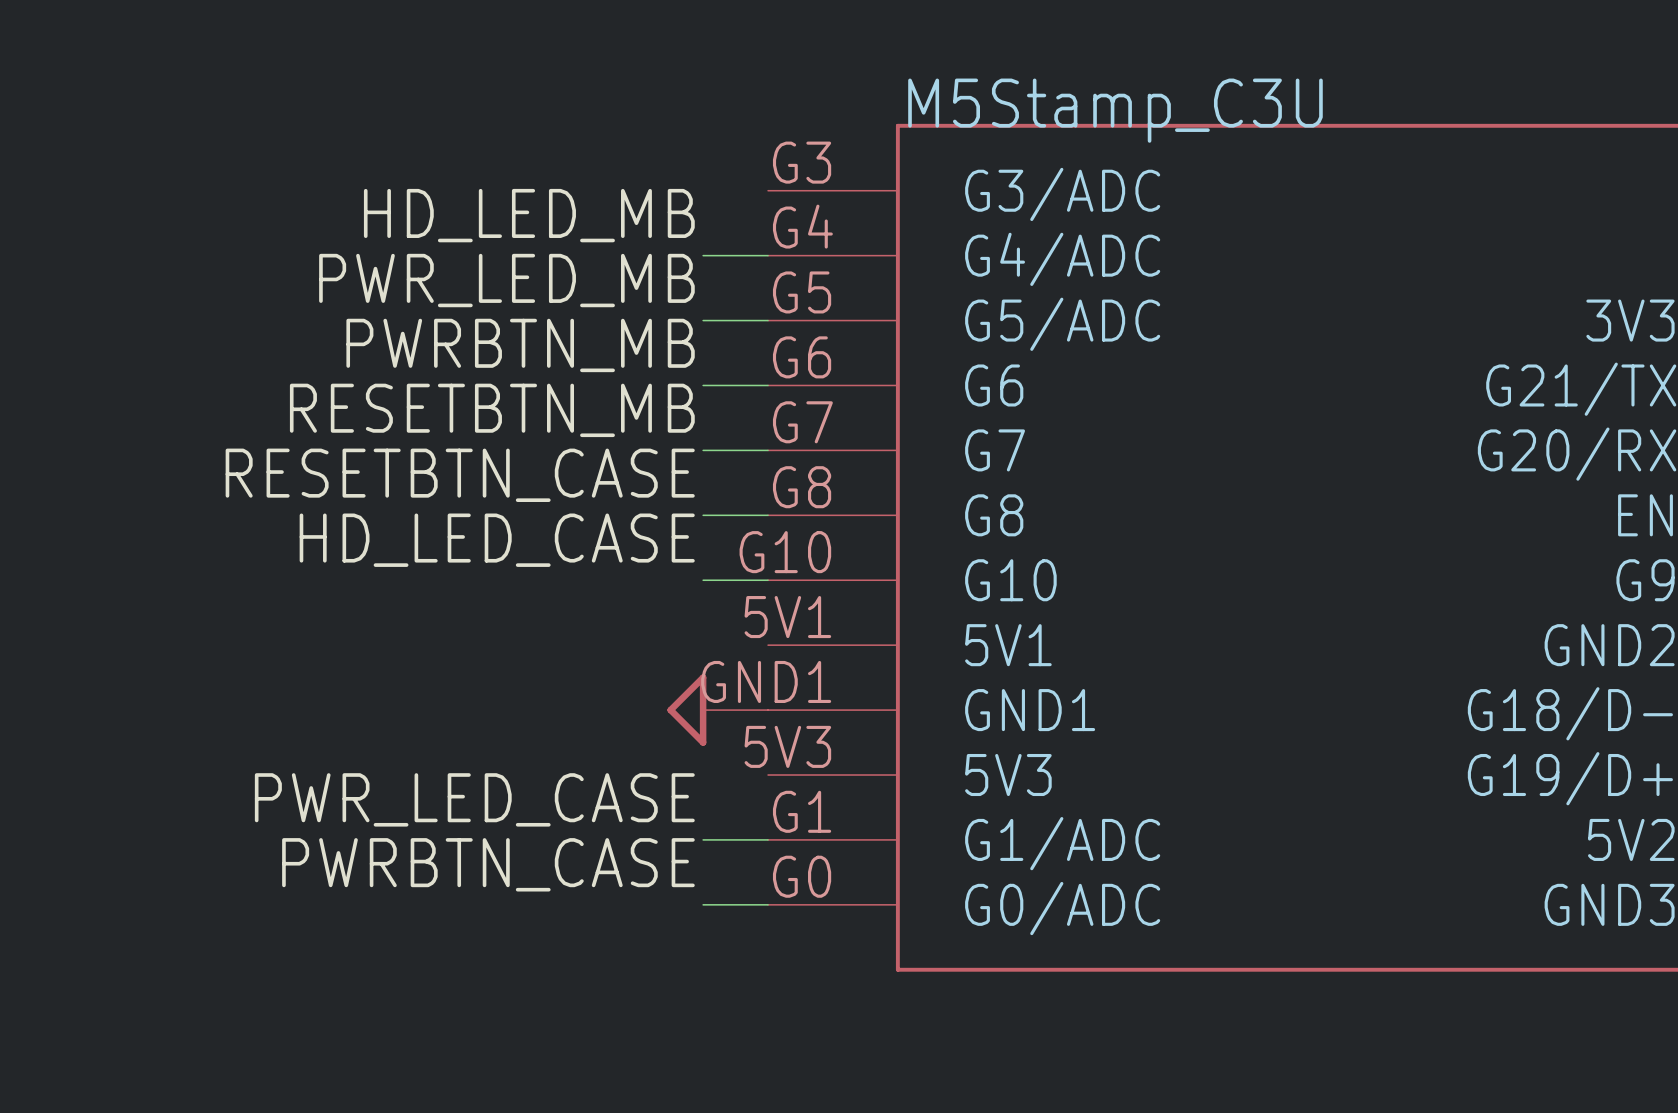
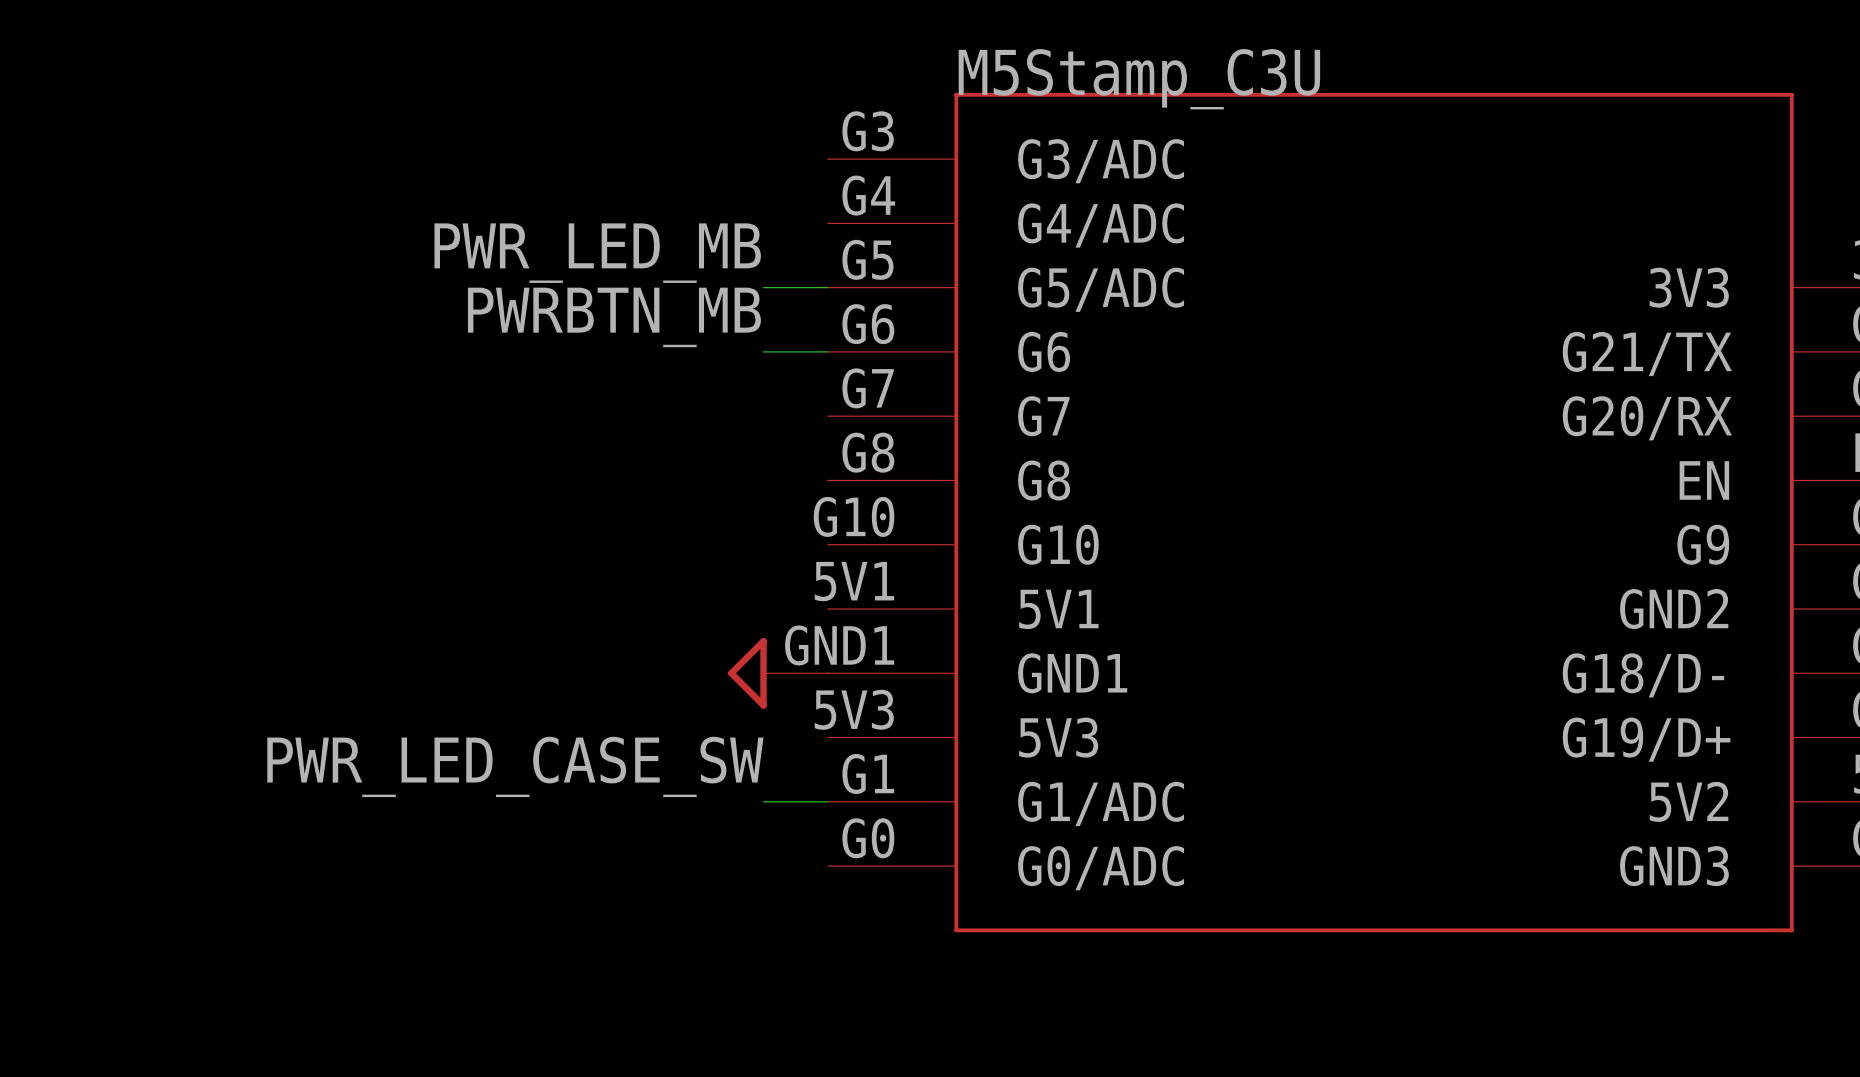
label: HD_LED_MB (529, 215) -> none
wire: (703, 255) (768, 255) -> none
label: RESETBTN_MB (492, 410) -> none
wire: (703, 450) (768, 450) -> none
label: RESETBTN_CASE (460, 475) -> none
wire: (703, 515) (768, 515) -> none
label: HD_LED_CASE (497, 540) -> none
wire: (703, 580) (768, 580) -> none
label: PWR_LED_CASE (474, 799) -> PWR_LED_CASE_SW (515, 766)
label: PWRBTN_CASE (488, 864) -> none
wire: (703, 904) (768, 904) -> none

